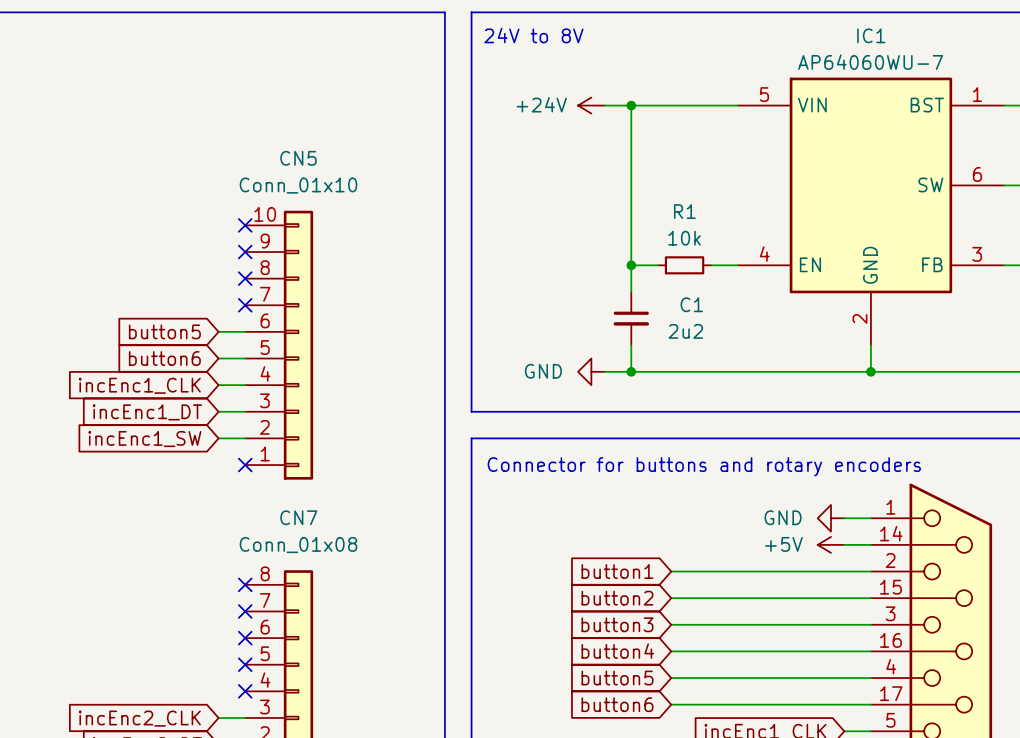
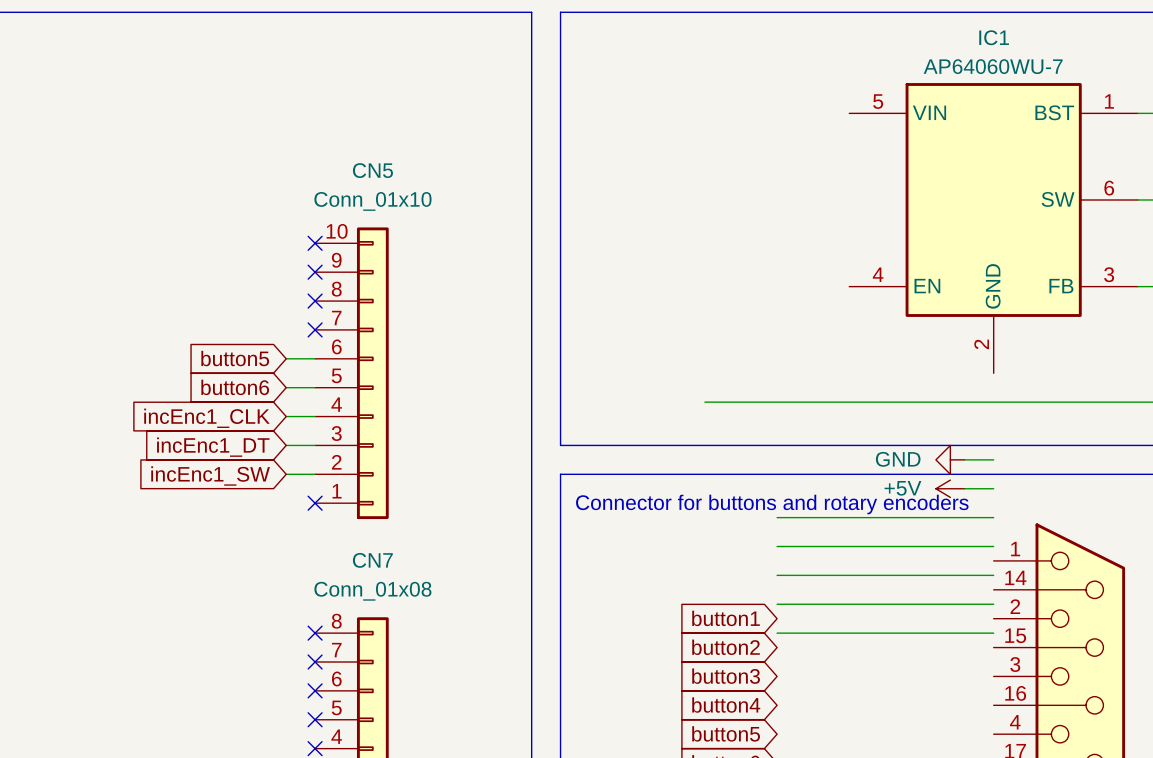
text: 24V to 8V (533, 35) -> none
power symbol: +24V (591, 105) -> none
wire: (604, 105) (737, 105) -> none
wire: (631, 105) (631, 291) -> none
junction: (631, 105) -> none
wire: (631, 265) (657, 265) -> none
junction: (631, 265) -> none
R1: 10k (684, 265) -> none
wire: (711, 265) (737, 265) -> none
C1: 2u2 (631, 318) -> none
wire: (631, 345) (631, 371) -> none
wire: (870, 345) (870, 371) -> none
power symbol: GND (591, 371) -> none
junction: (631, 371) -> none
junction: (870, 371) -> none
power symbol position: GND (831, 518) -> GND (950, 459)
wire: (844, 518) (870, 518) -> (964, 459) (993, 459)
power symbol position: +5V (831, 544) -> +5V (950, 488)
wire: (844, 544) (870, 544) -> (964, 488) (993, 488)
wire: (671, 571) (870, 571) -> (777, 517) (993, 517)
wire: (671, 598) (870, 598) -> (777, 546) (993, 546)
wire: (671, 624) (870, 624) -> (777, 575) (993, 575)
wire: (671, 651) (870, 651) -> (777, 604) (993, 604)
wire: (671, 678) (870, 678) -> (777, 633) (993, 633)

